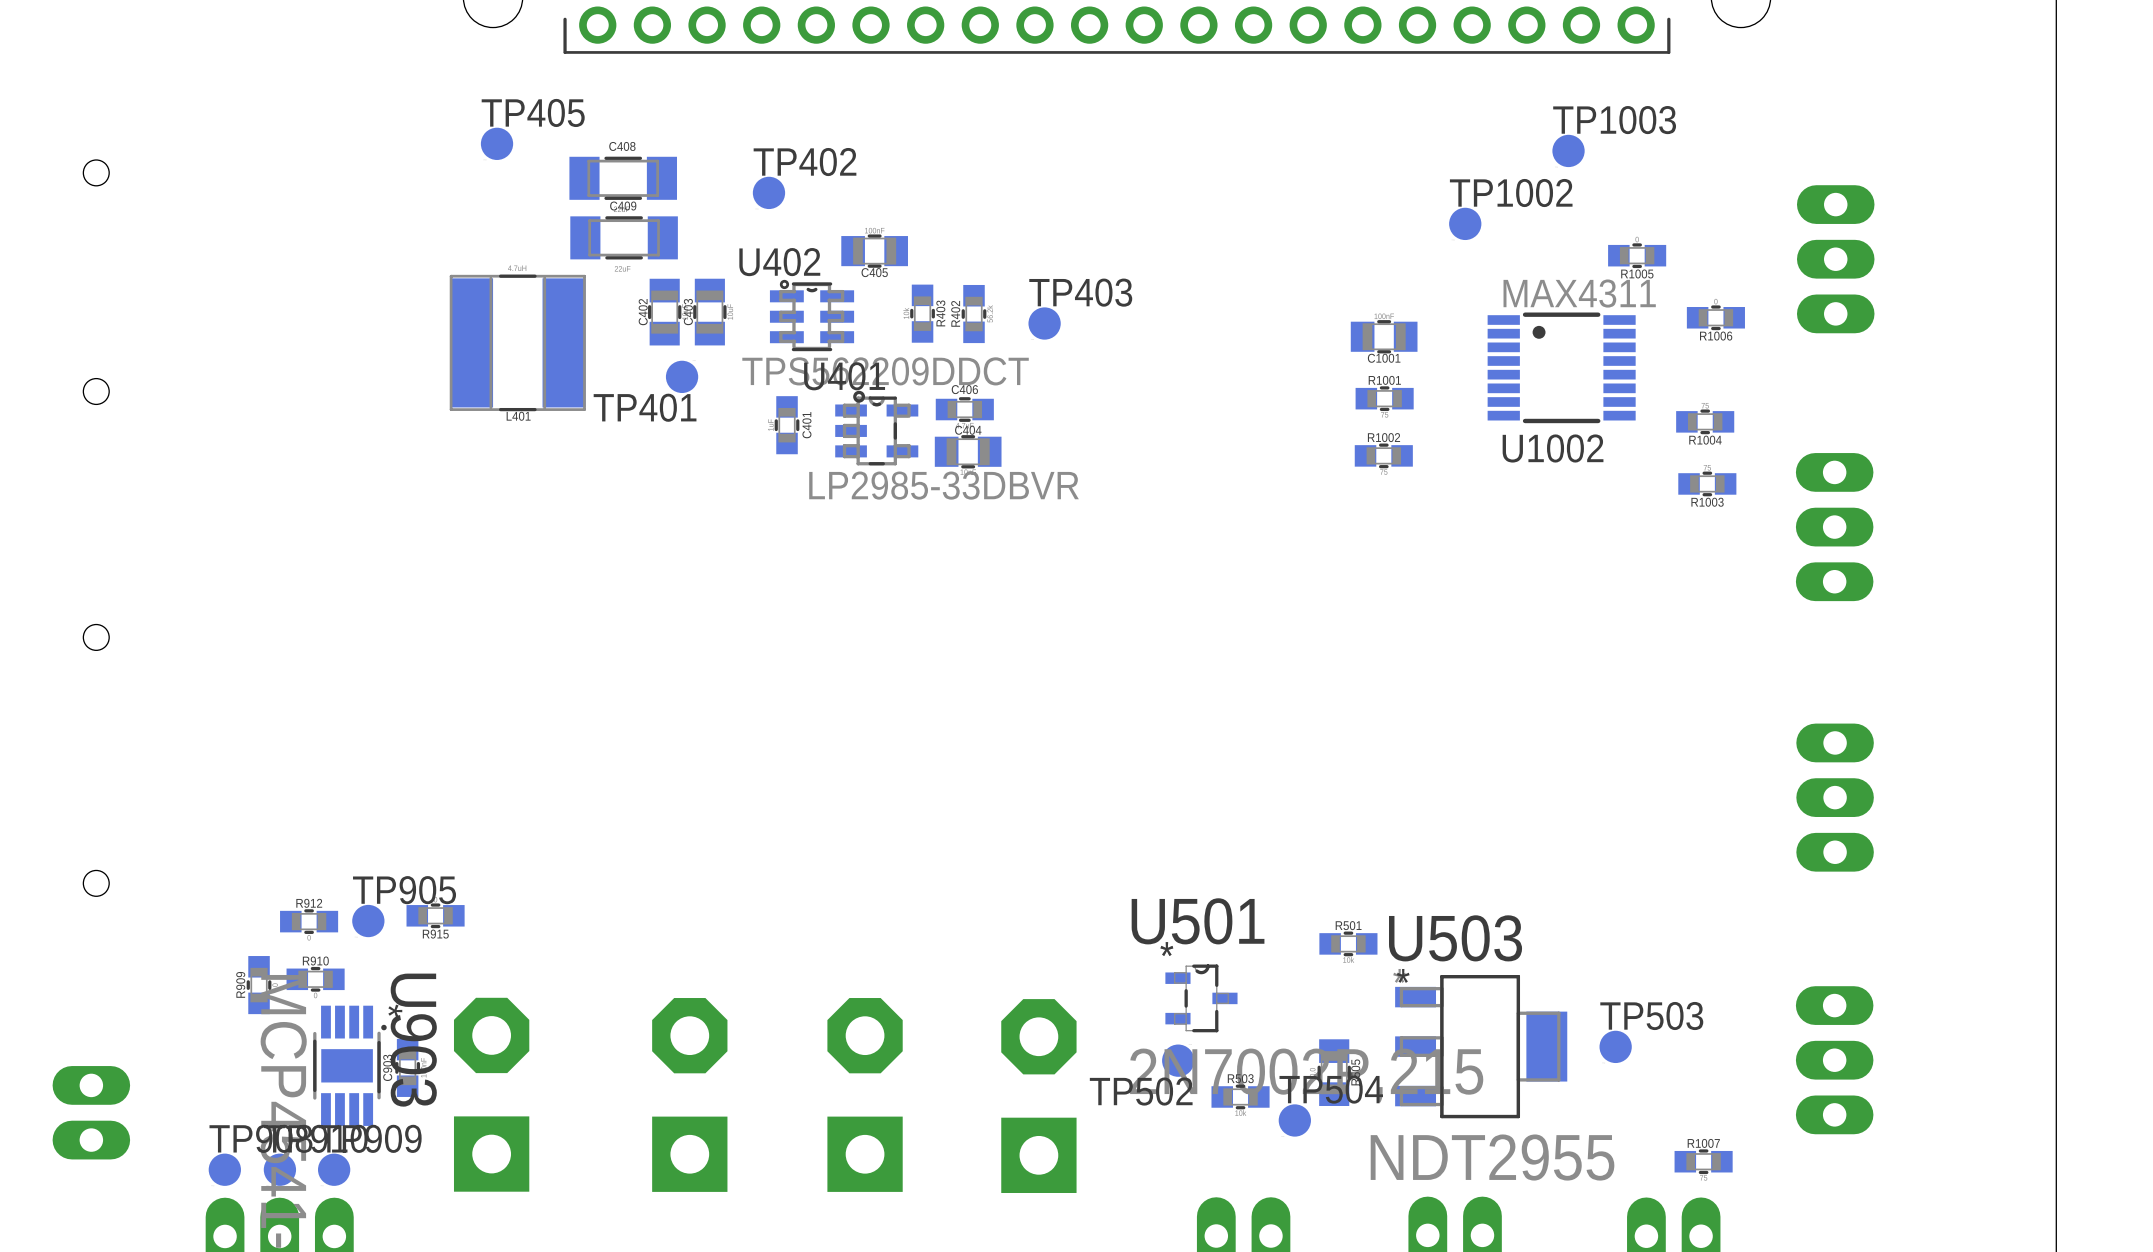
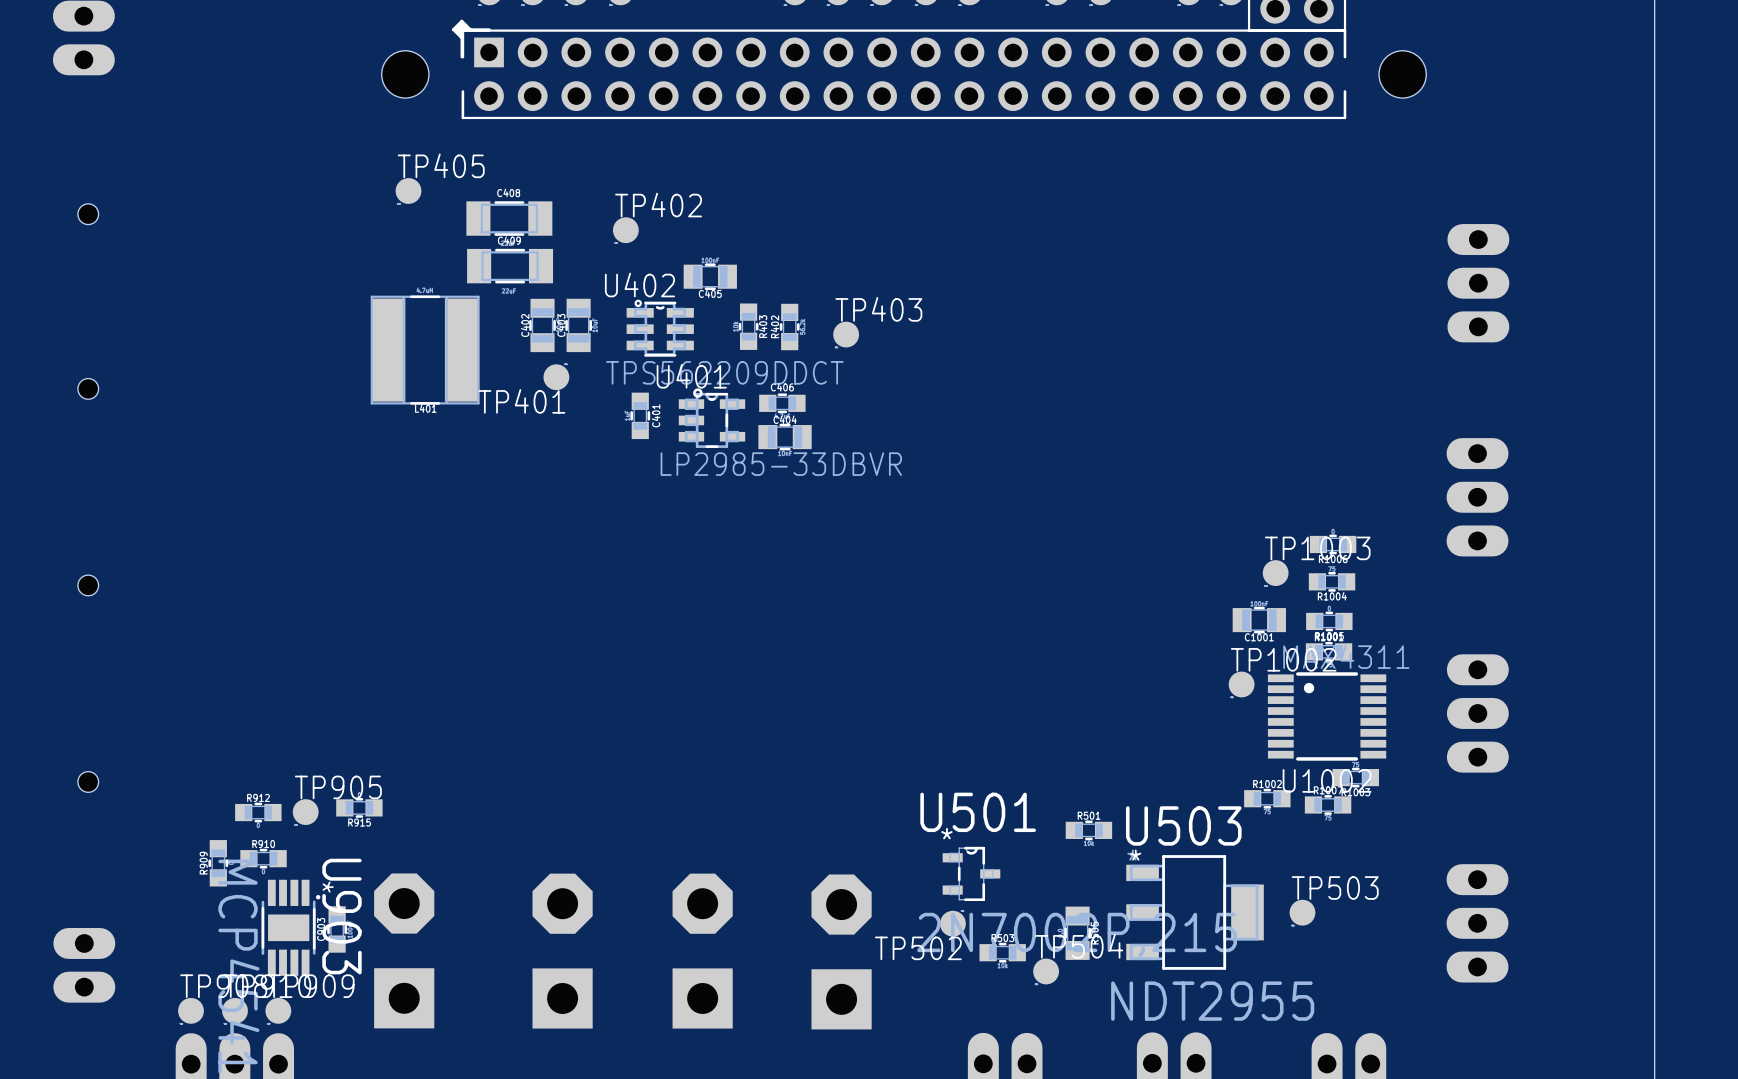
TP1003 position: (1568, 150) -> (1275, 573)
TP1002 position: (1465, 223) -> (1241, 684)
R1005 position: (1637, 255) -> (1329, 621)
R1006 position: (1715, 317) -> (1333, 544)
C1001 position: (1384, 336) -> (1259, 620)
U1002 position: (1561, 367) -> (1327, 716)
R1001 position: (1384, 398) -> (1329, 651)
R1004 position: (1705, 421) -> (1332, 581)
R1002 position: (1383, 455) -> (1267, 798)
R1003 position: (1707, 483) -> (1355, 777)
R1007 position: (1703, 1161) -> (1328, 804)

